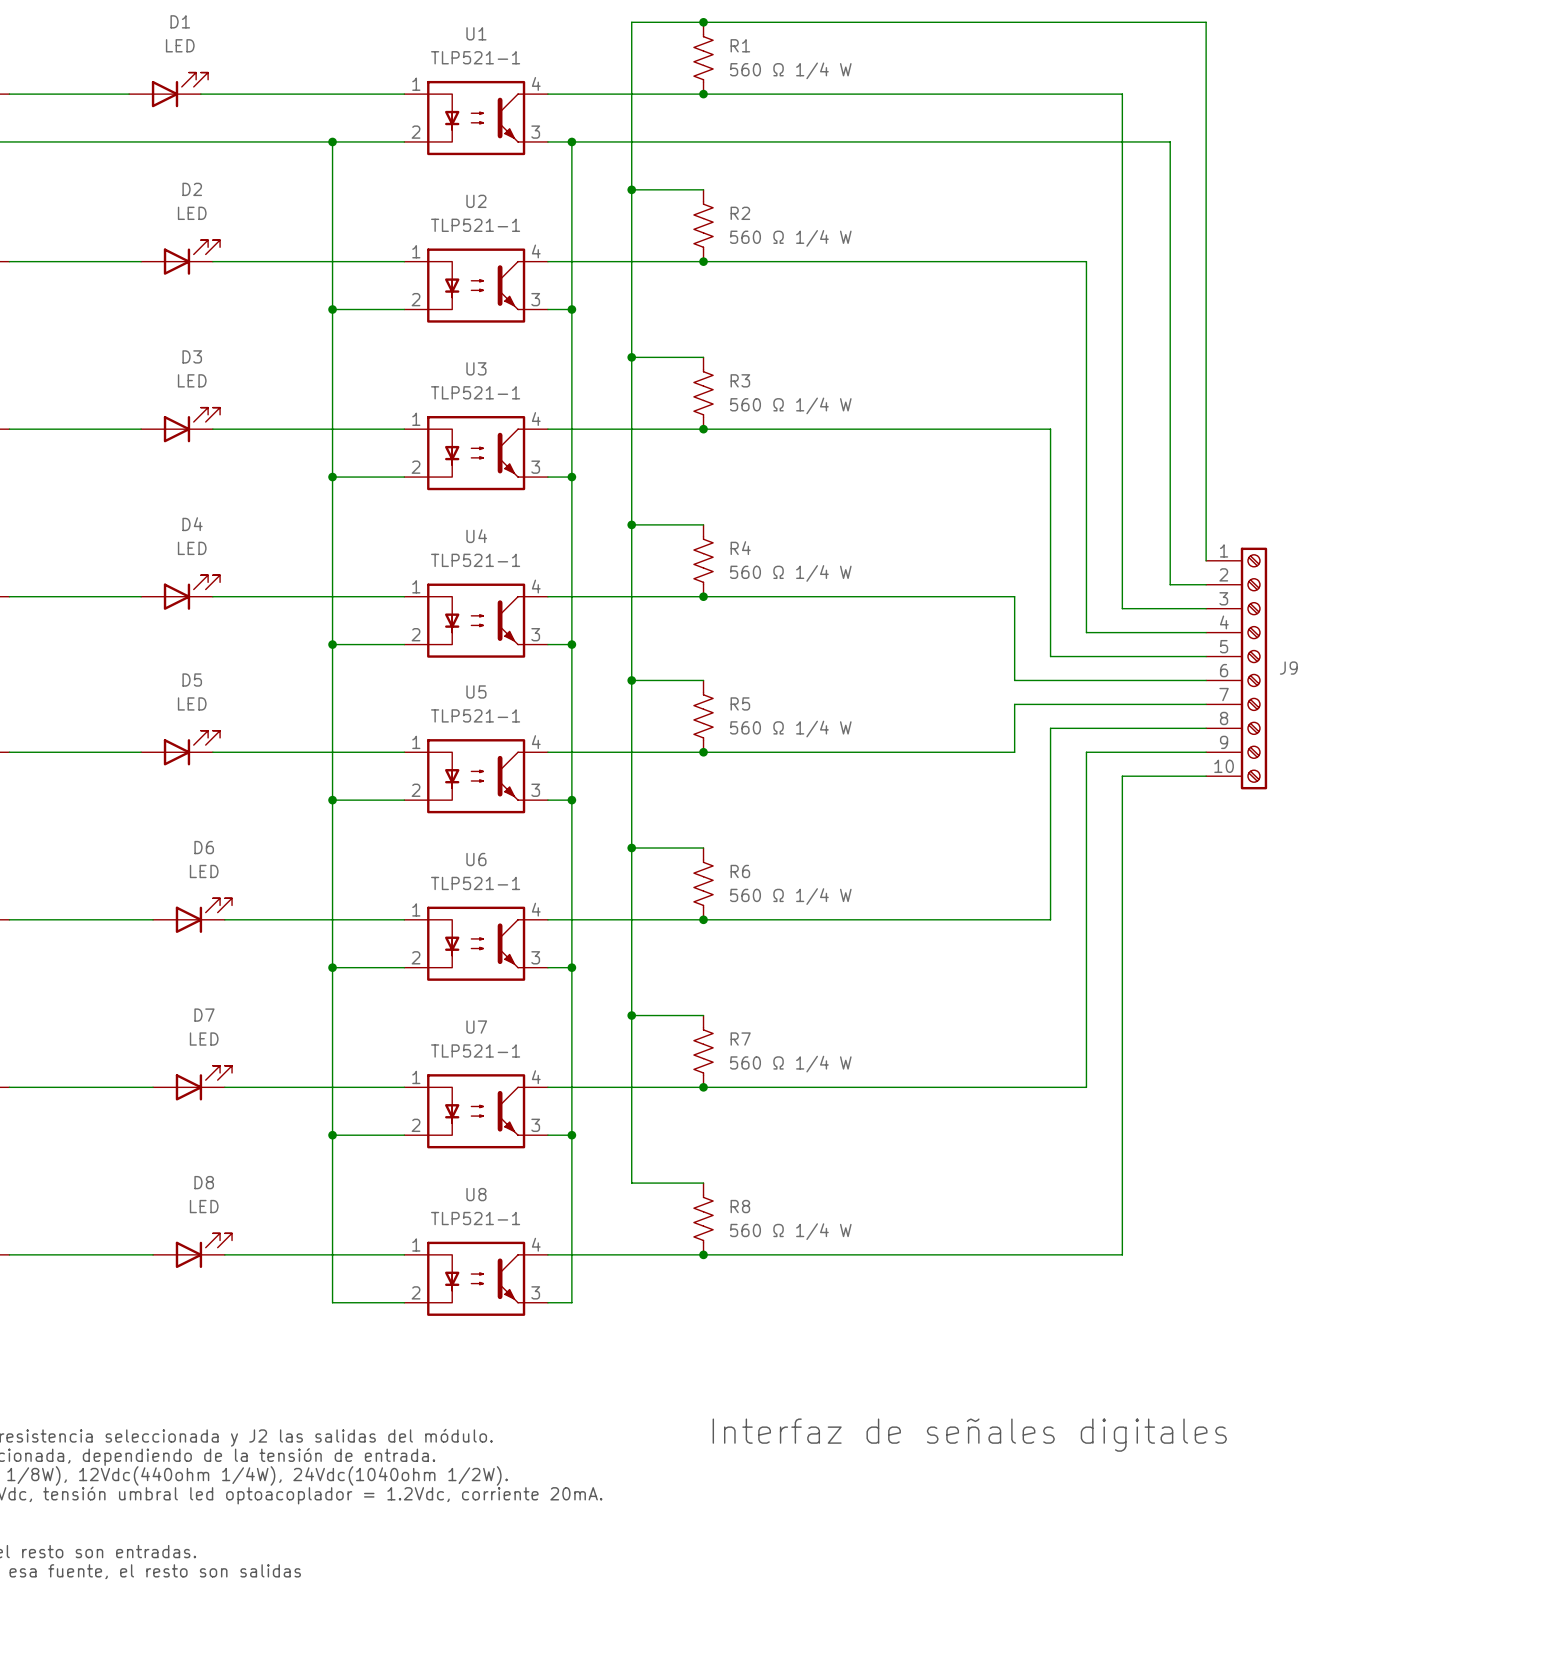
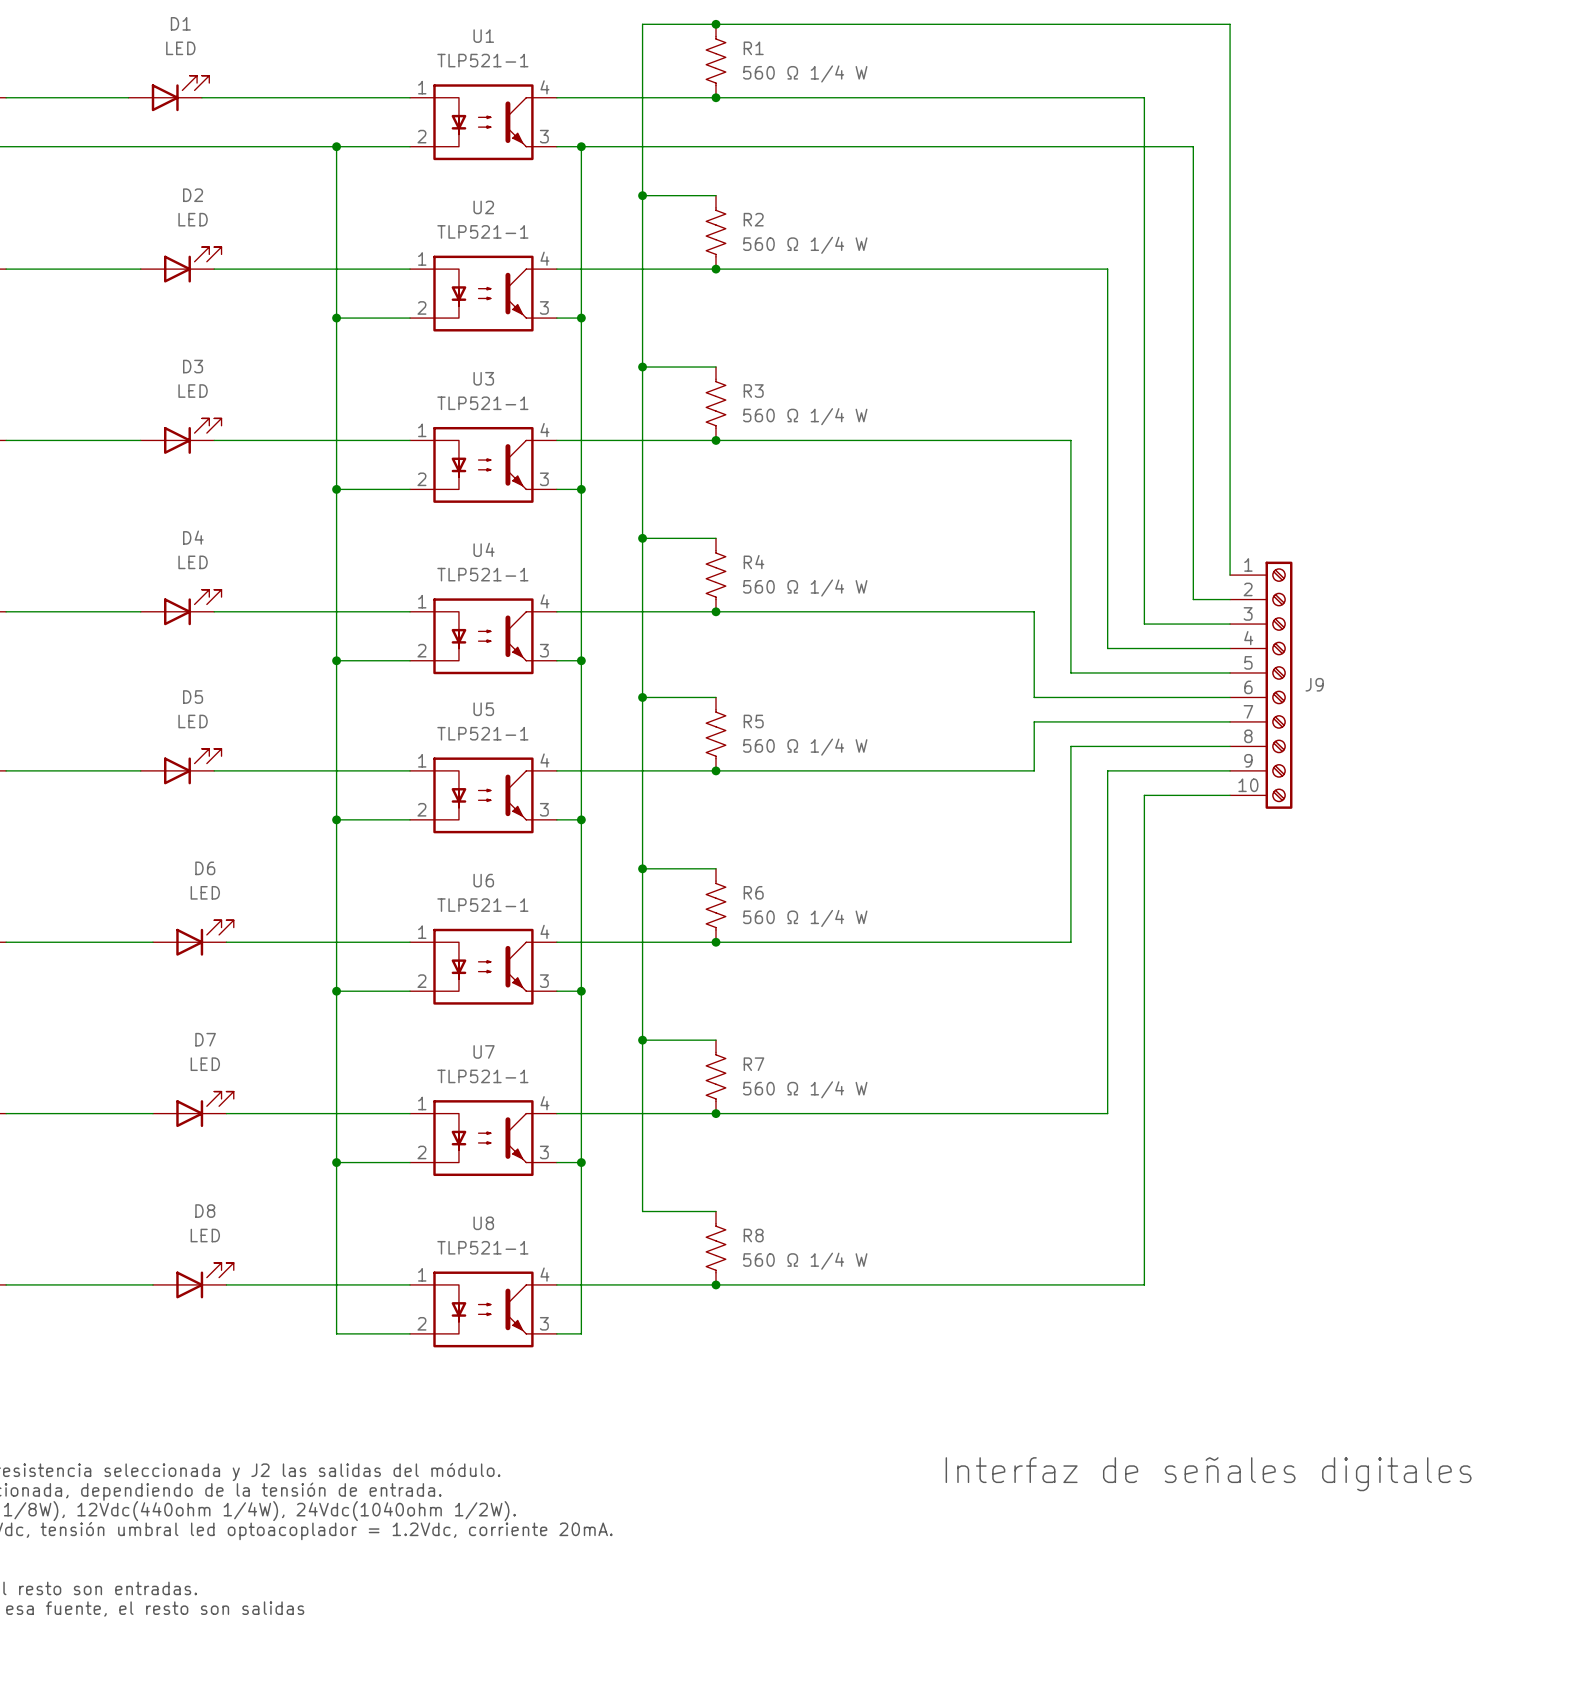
text position: Interfaz de señales digitales (969, 1435) -> Interfaz de señales digitales (1208, 1474)

